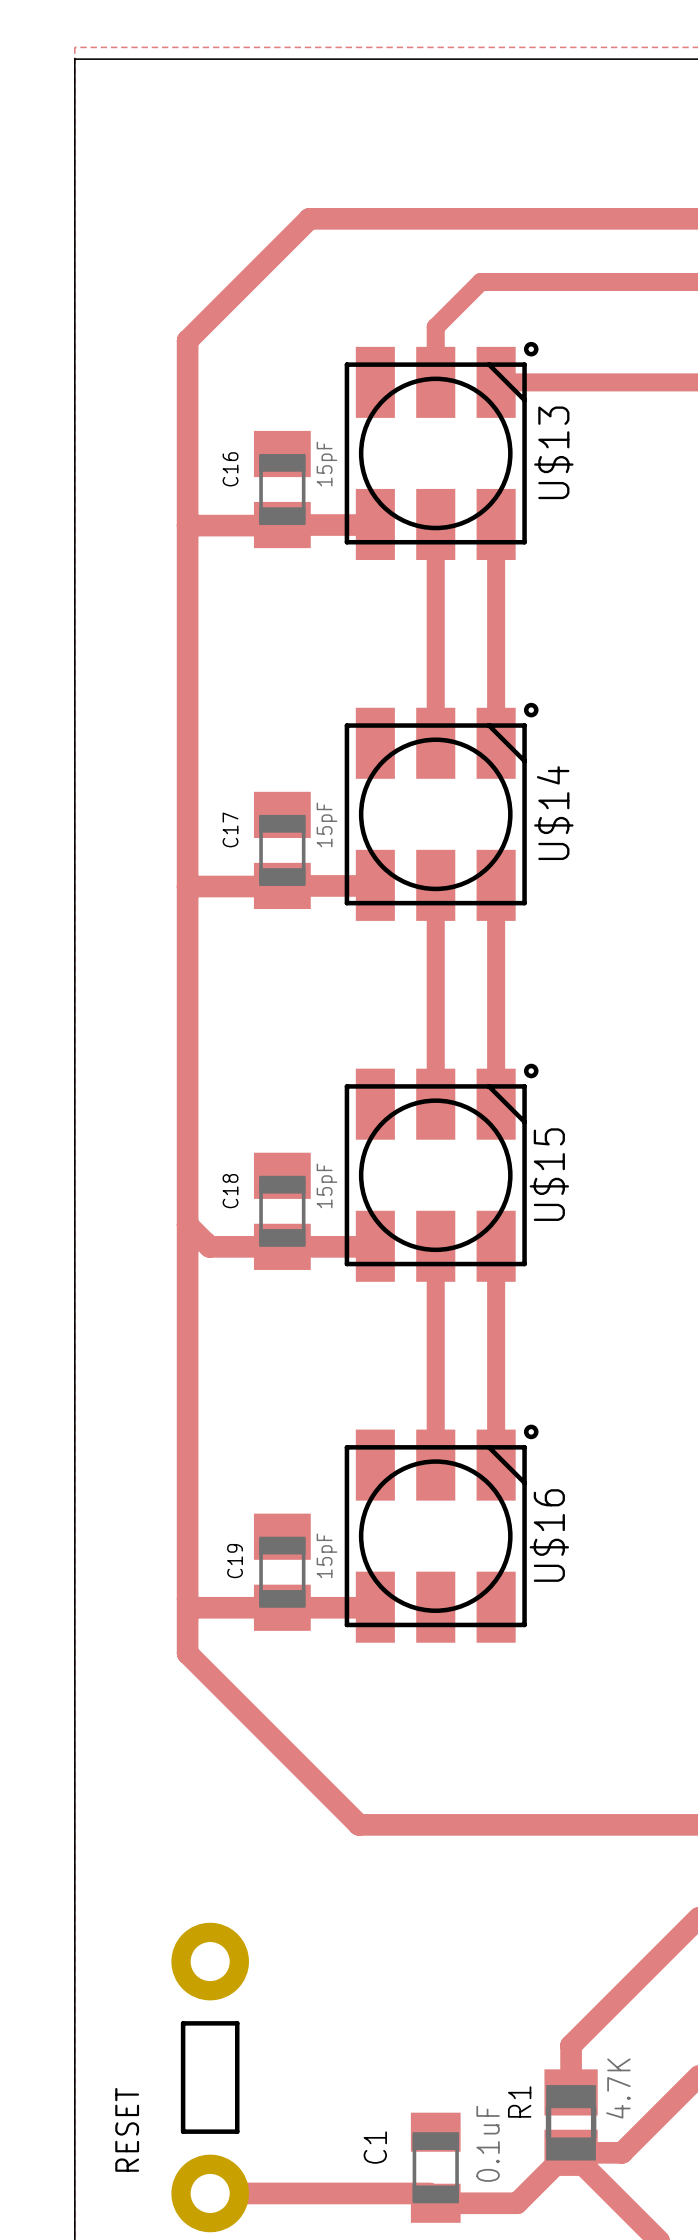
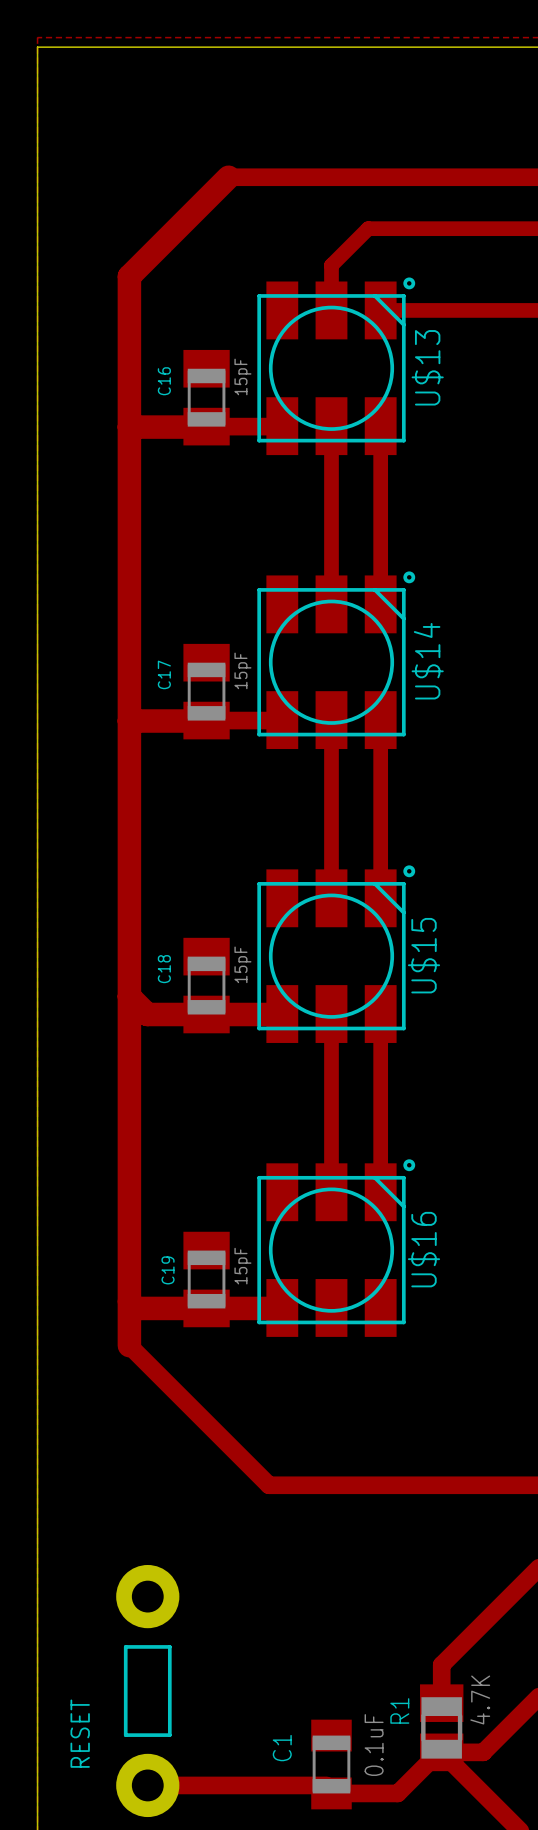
top track width: thin (309, 218) (187, 340) (187, 1653) -> thick (228, 177) (129, 276) (129, 1345)
top track width: thin (187, 525) (281, 525) -> thick (129, 427) (206, 427)
top track width: thin (187, 886) (281, 886) -> thick (129, 721) (206, 721)
top track width: thin (187, 1224) (209, 1246) (374, 1246) -> thick (129, 996) (147, 1014) (281, 1014)
top track width: thin (196, 1607) (374, 1607) -> thick (136, 1308) (281, 1308)

